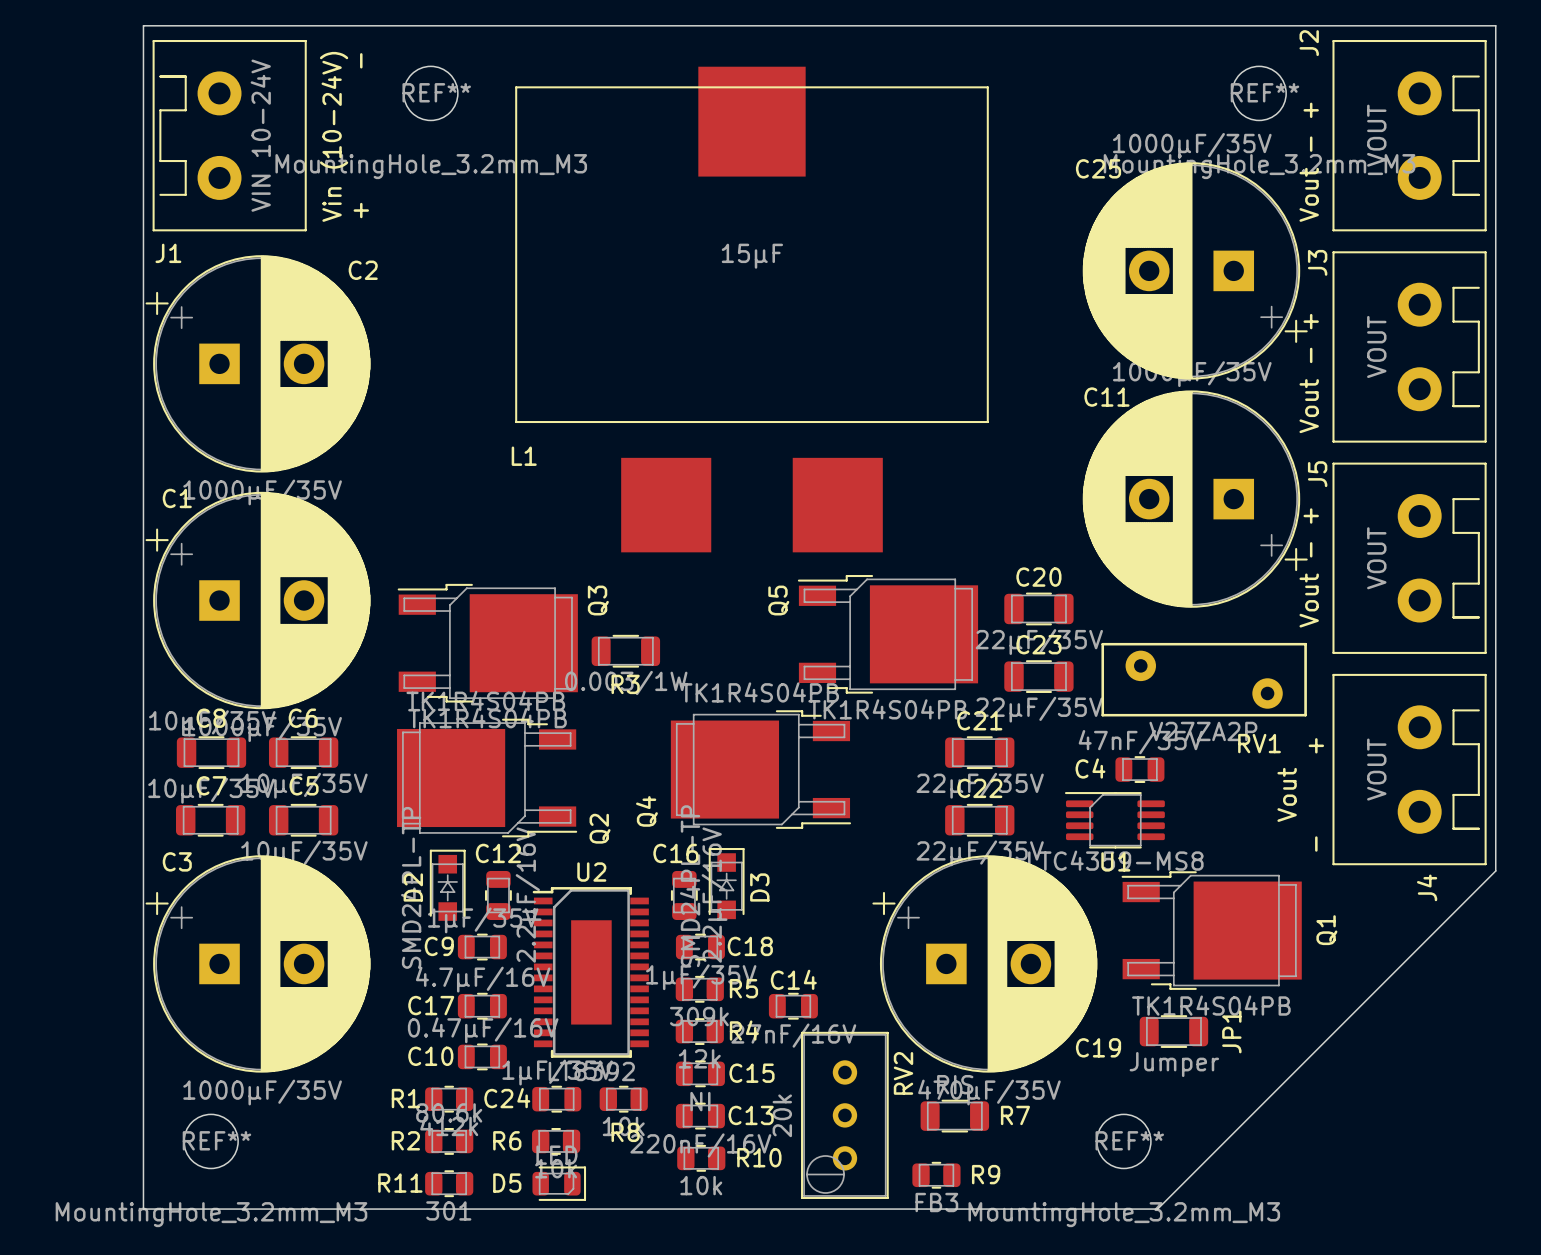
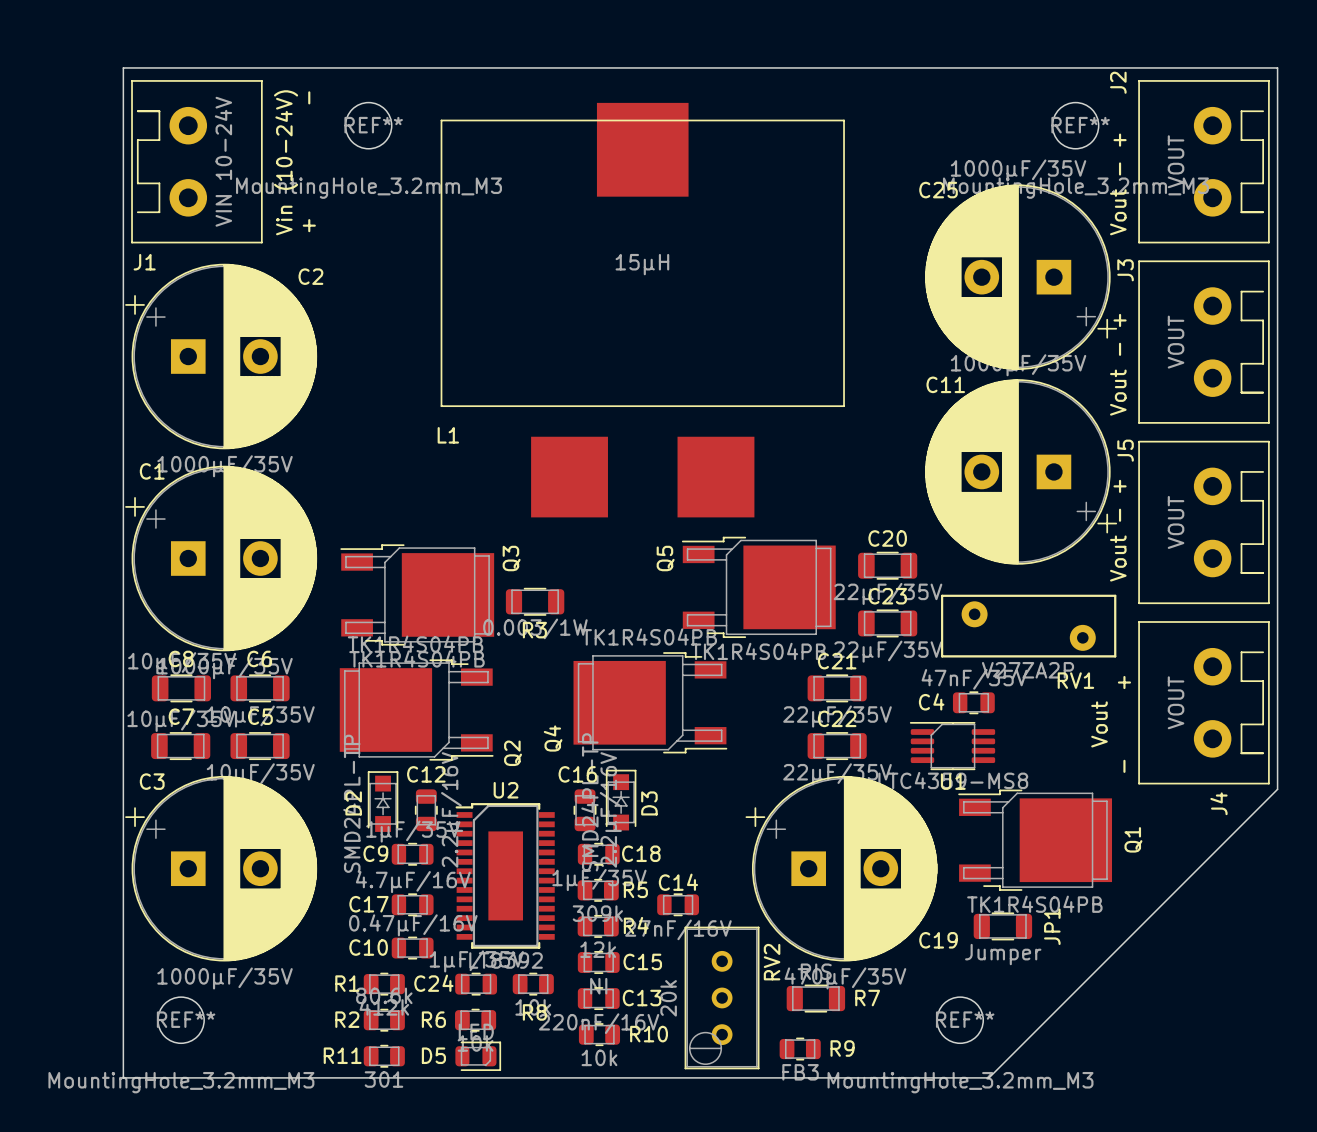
L1 value: 15µF (752, 256) -> 15µH (642, 264)

